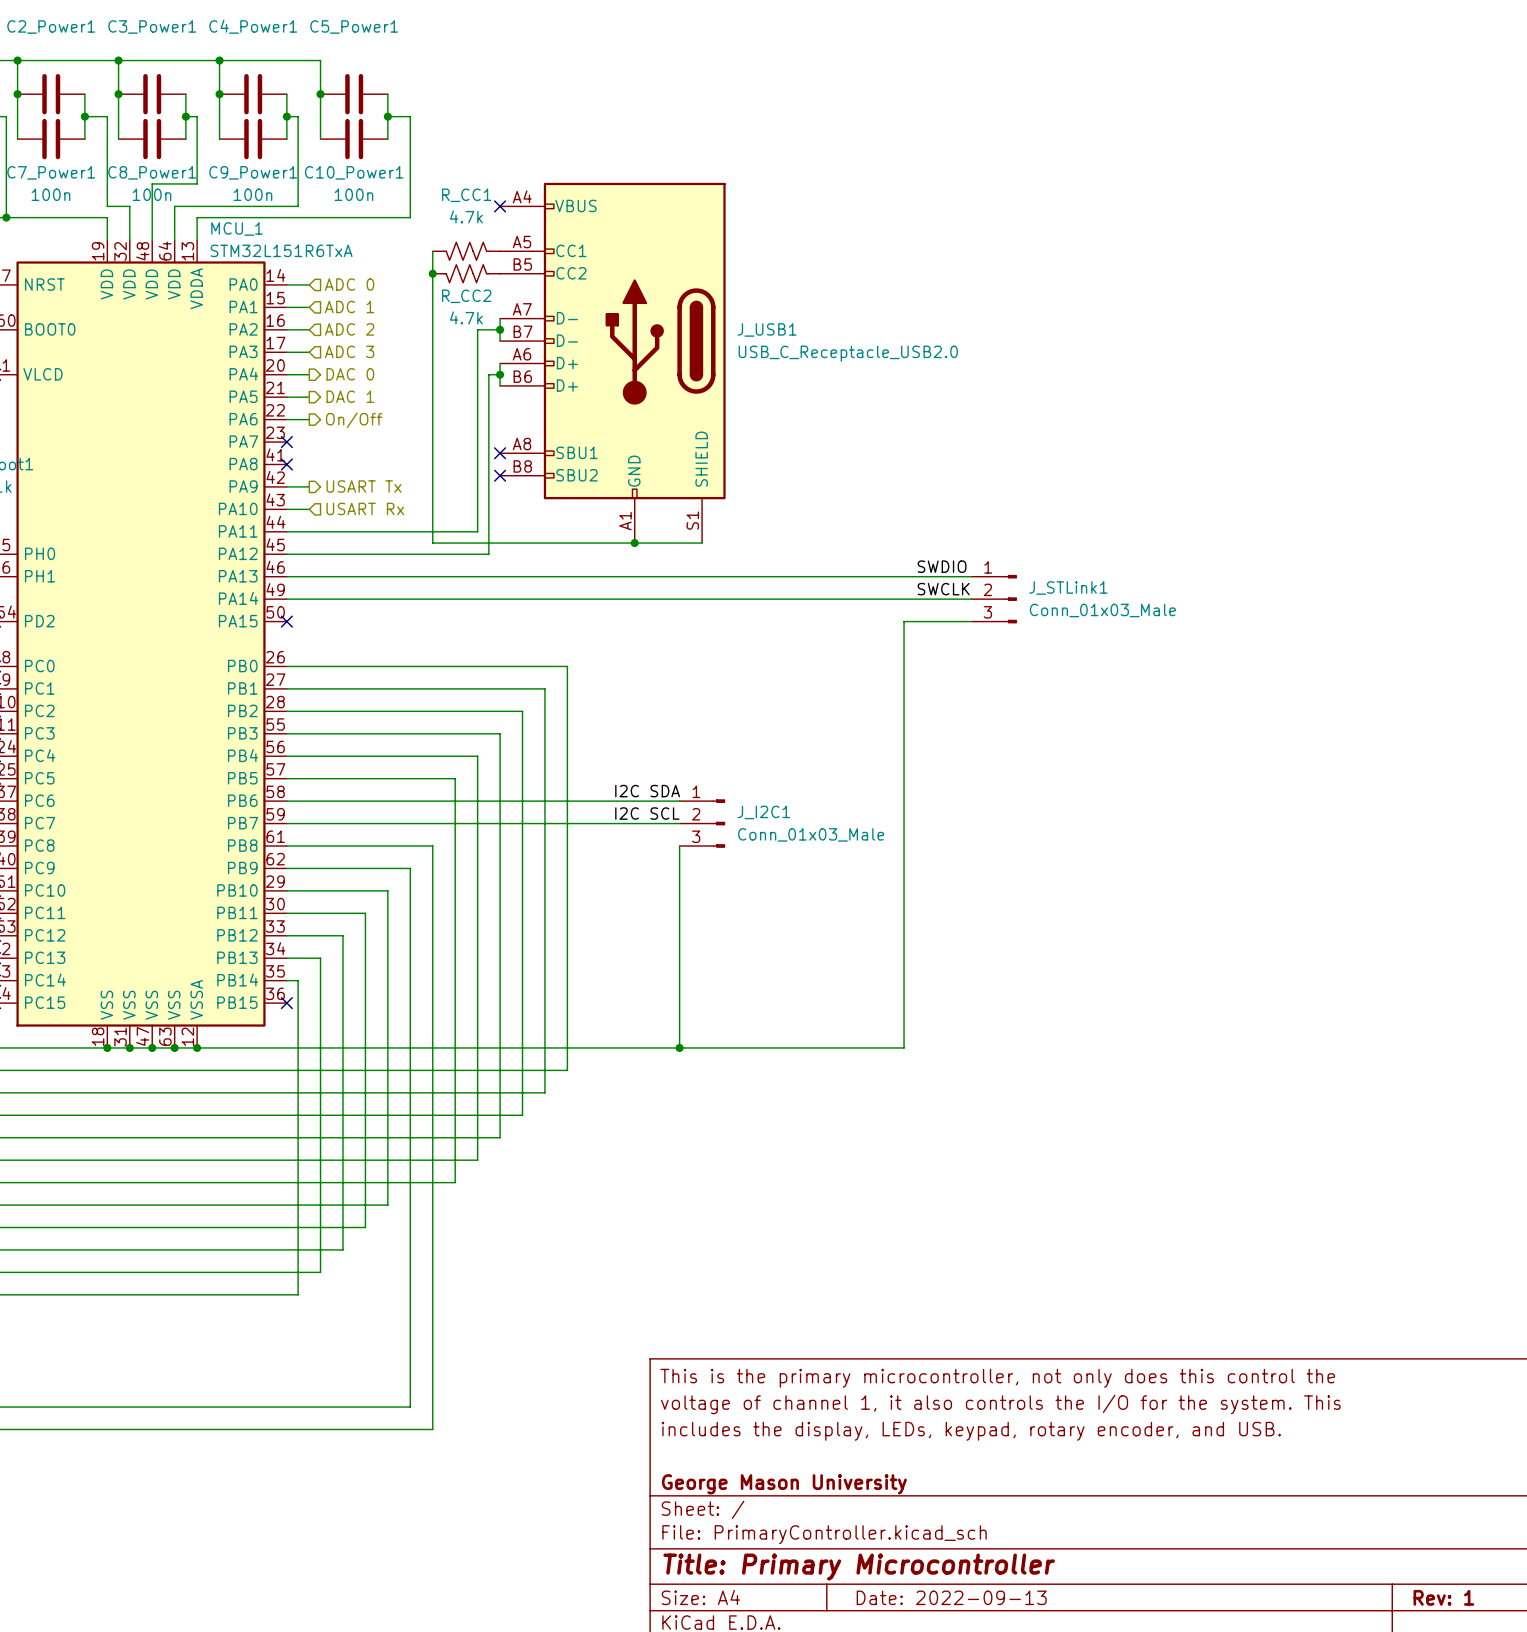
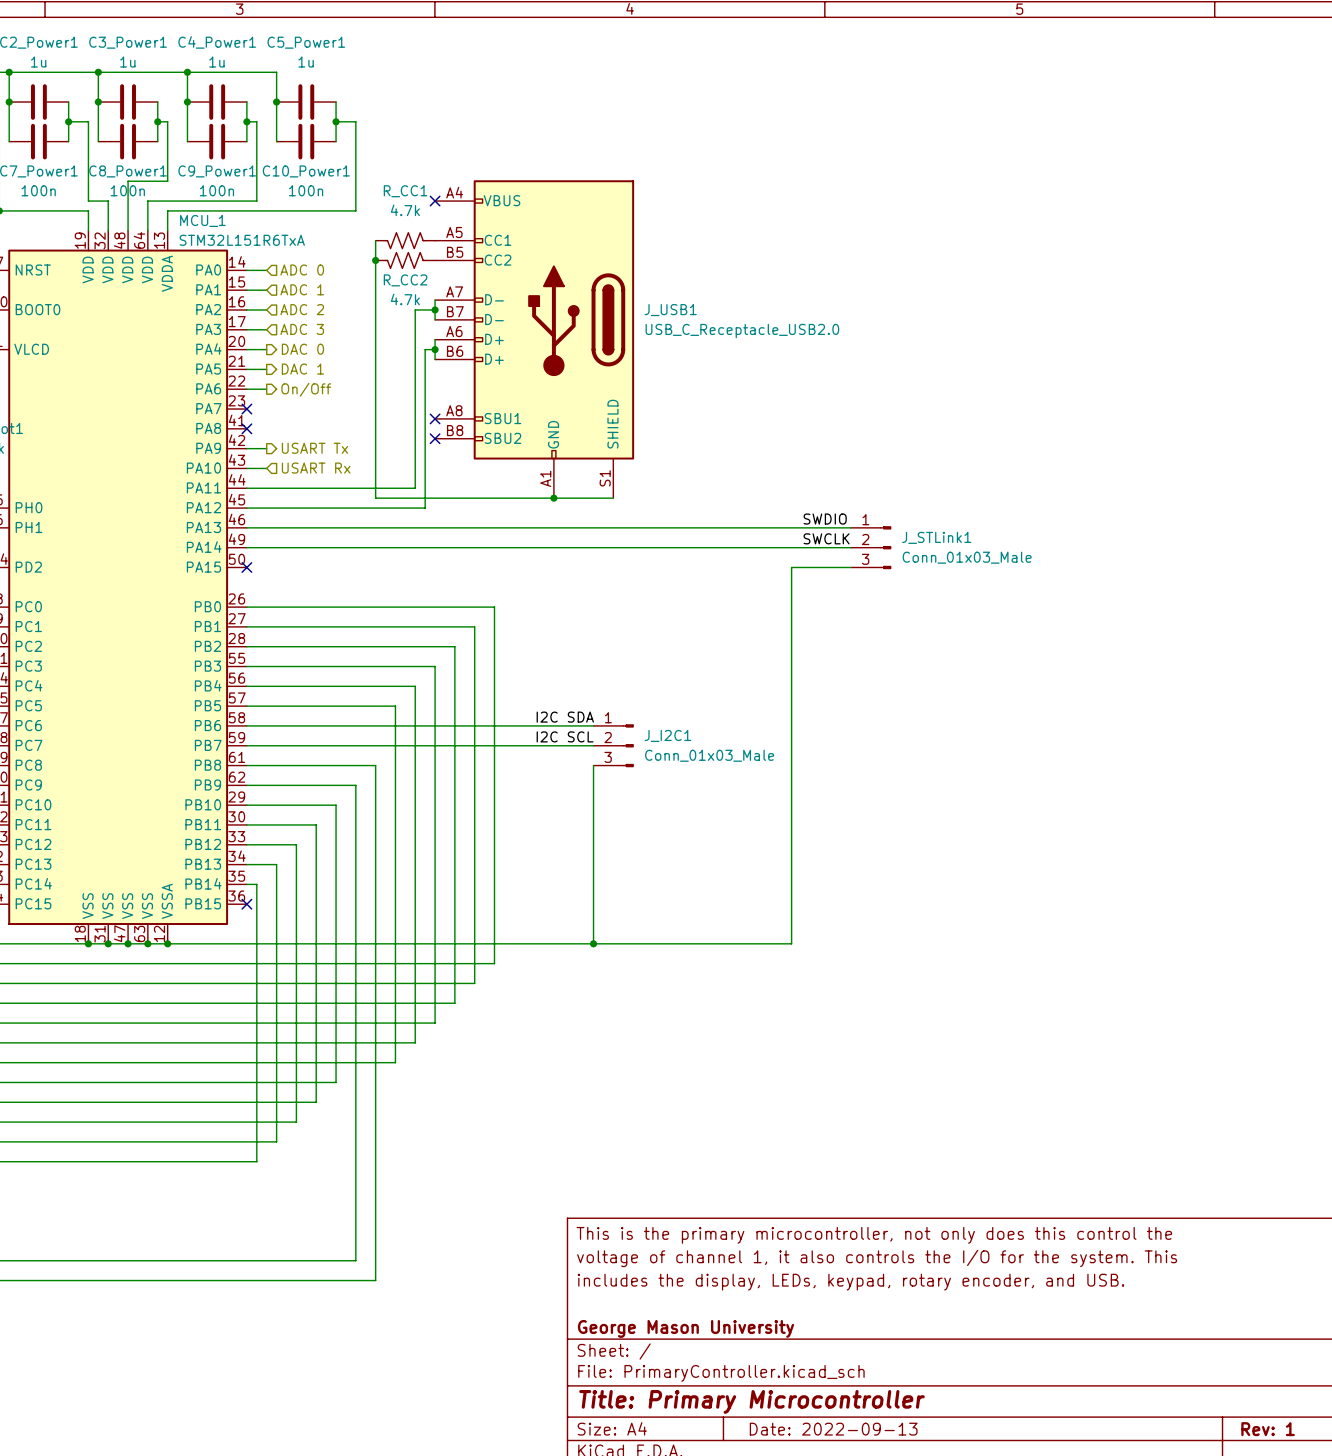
C2_Power1 value: none -> 1u (38, 62)
C3_Power1 value: none -> 1u (127, 62)
C4_Power1 value: none -> 1u (216, 62)
C5_Power1 value: none -> 1u (306, 62)

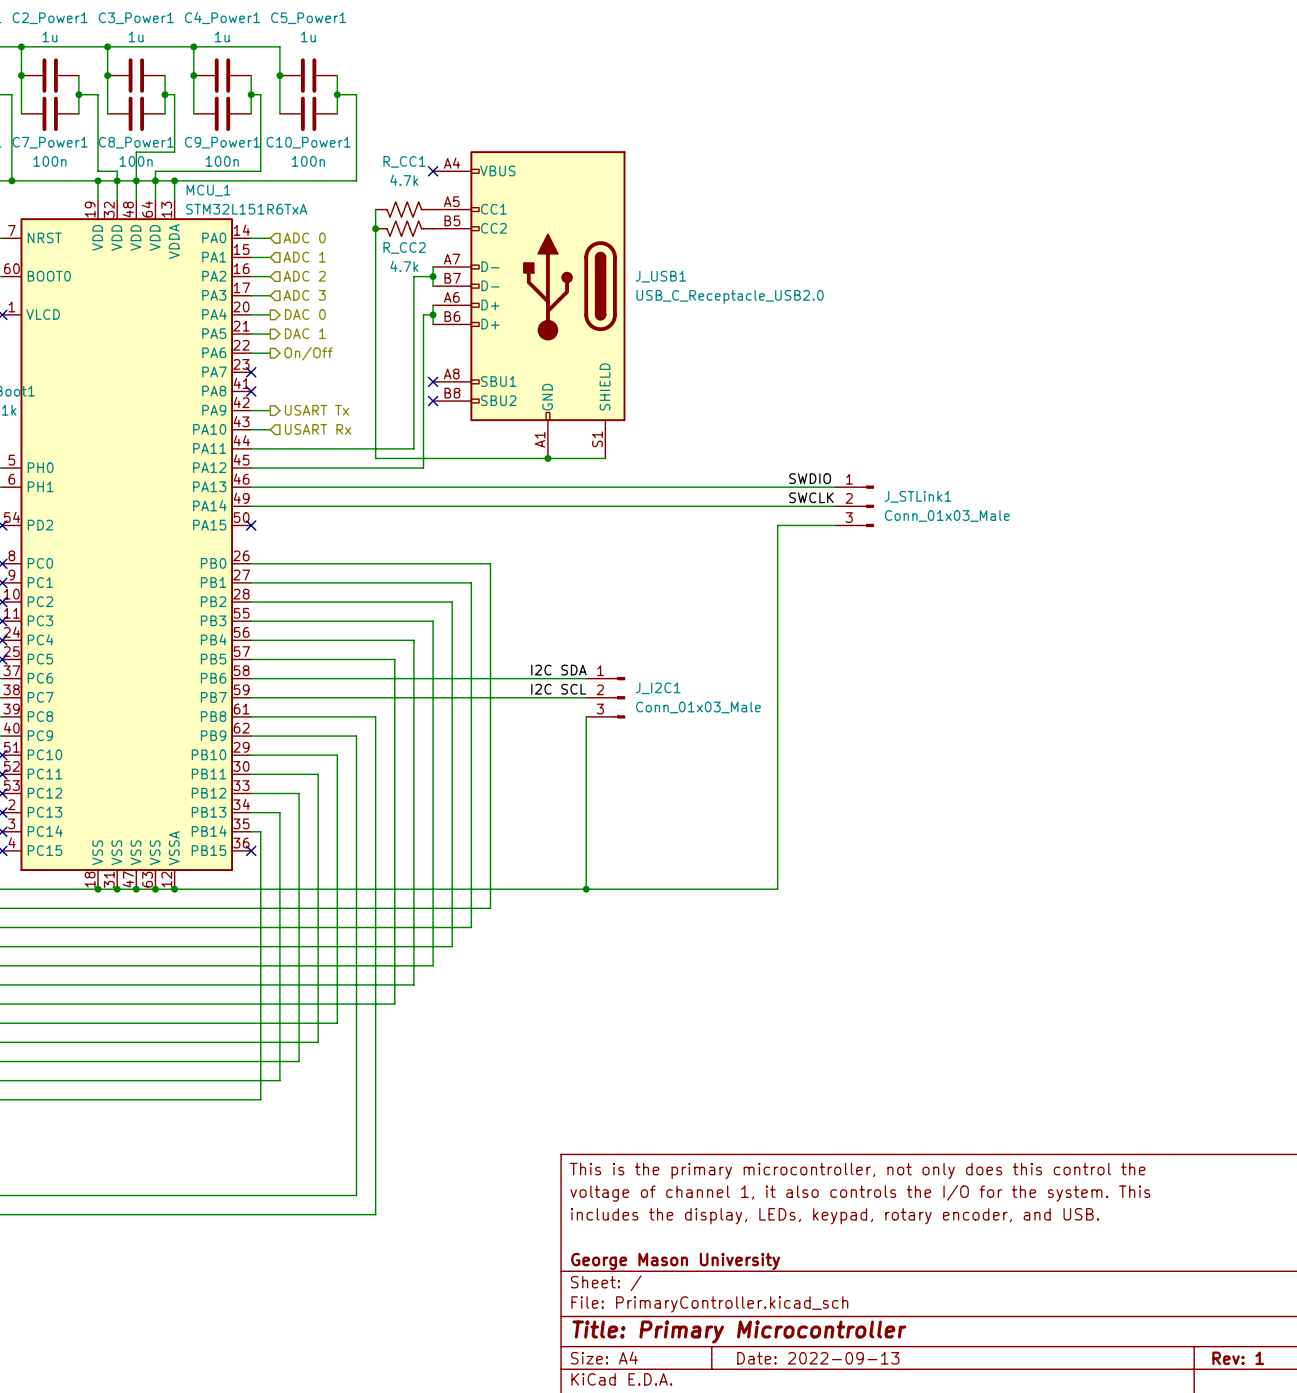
wire: none -> (98, 180) (174, 180)
junction: none -> (98, 180)
junction: none -> (117, 180)
junction: none -> (136, 180)
junction: none -> (155, 180)
junction: none -> (174, 180)

